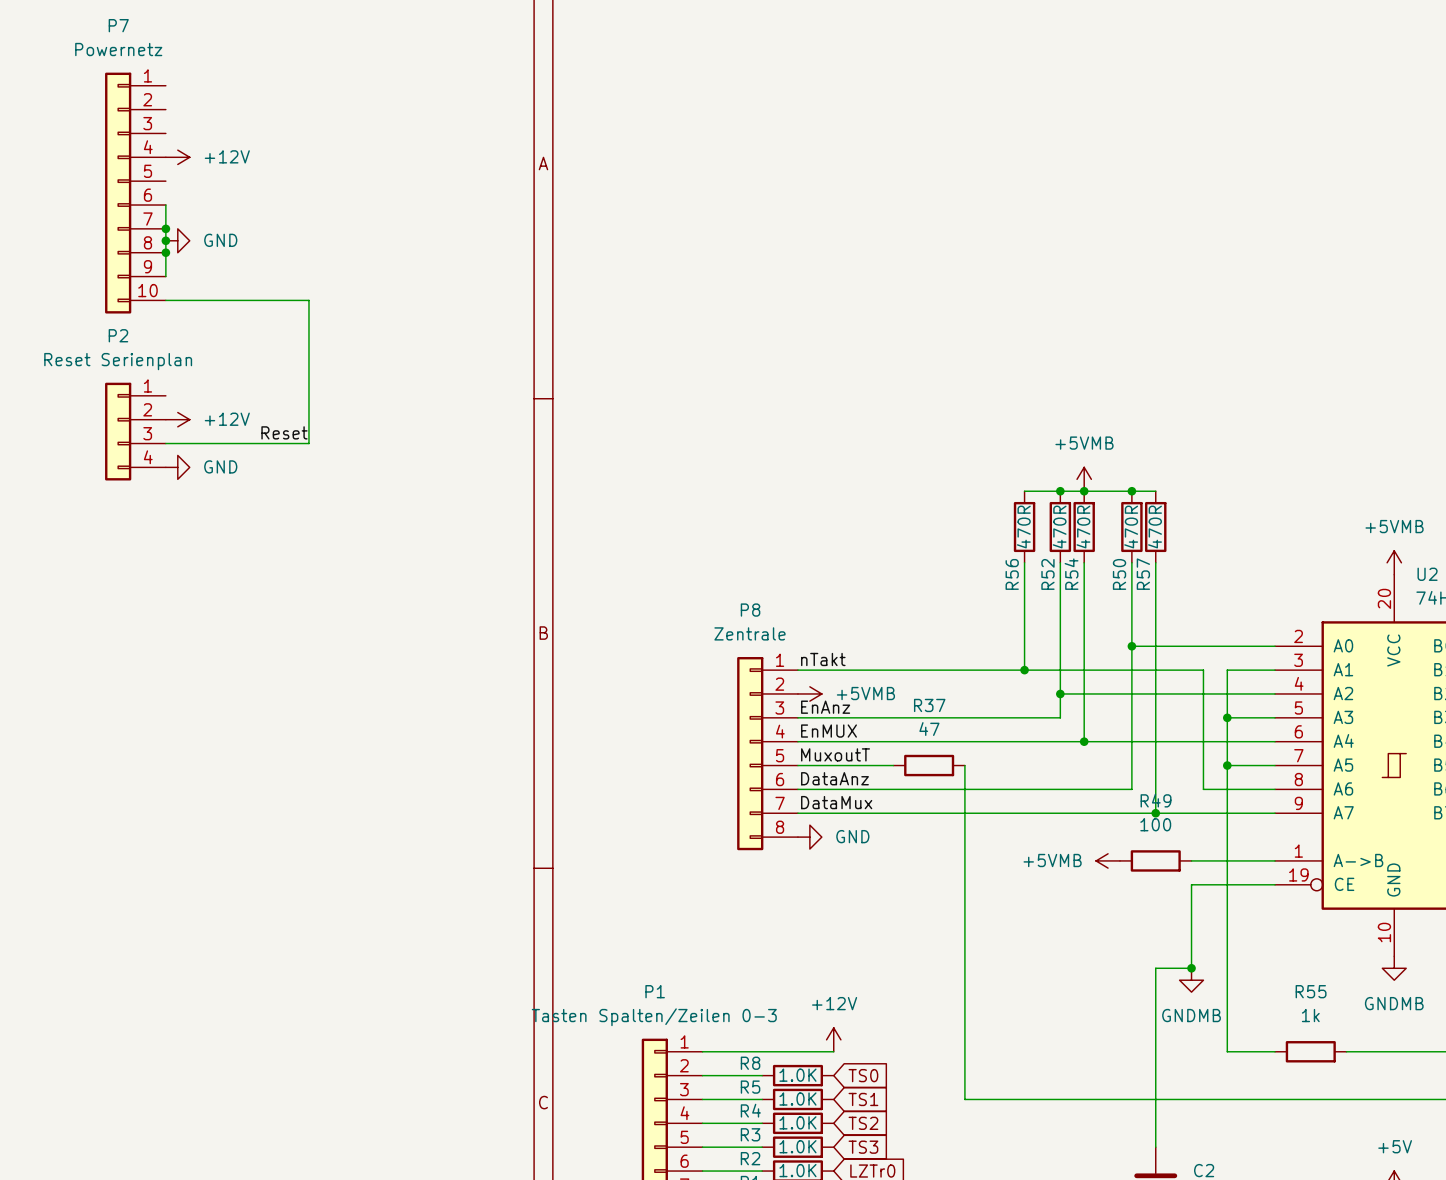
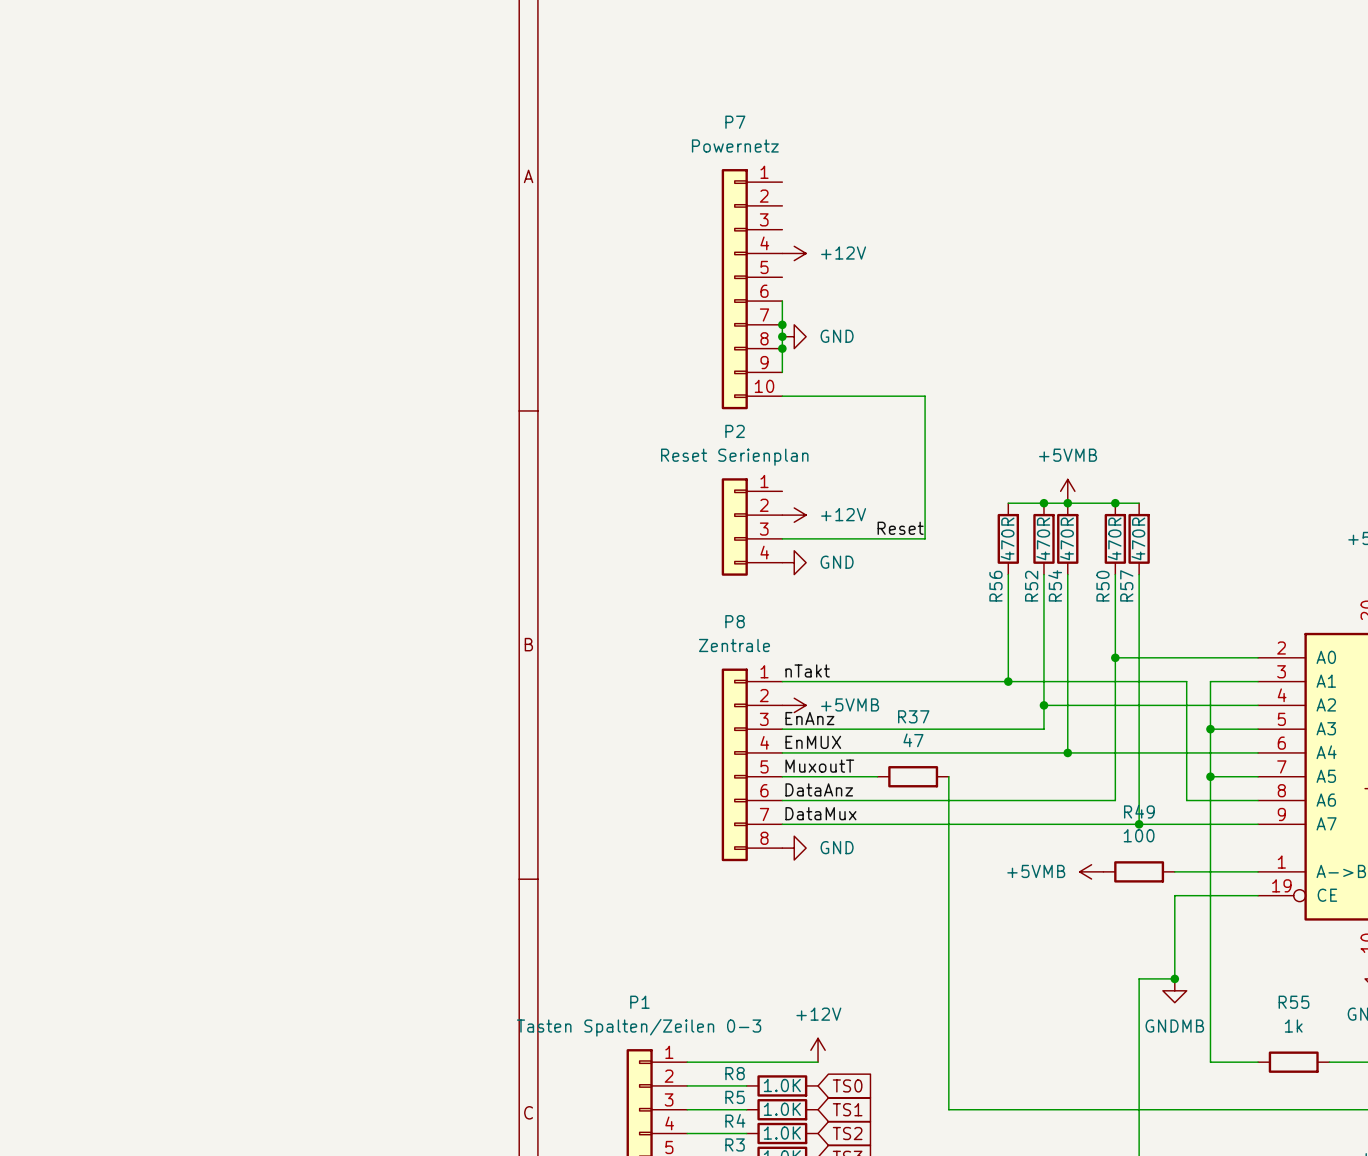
power symbol: +12V (177, 157) -> none
P7 position: (135, 193) -> (752, 289)
wire: (165, 205) (165, 276) -> none
junction: (165, 228) -> none
junction: (165, 240) -> none
power symbol: GND (177, 240) -> none
power symbol: none -> +12V (794, 253)
junction: (165, 252) -> none
wire: none -> (782, 301) (782, 372)
wire: (165, 300) (308, 300) (308, 443) (165, 443) -> none
junction: none -> (782, 324)
junction: none -> (782, 336)
power symbol: none -> GND (794, 336)
junction: none -> (782, 348)
wire: none -> (782, 396) (925, 396) (925, 538) (782, 538)
power symbol: +12V (177, 419) -> none
P2 position: (135, 431) -> (752, 527)
label: Reset (284, 432) -> none
power symbol: GND (177, 467) -> none
power symbol: none -> +12V (794, 515)
label: none -> Reset (900, 528)
power symbol: none -> GND (794, 562)

